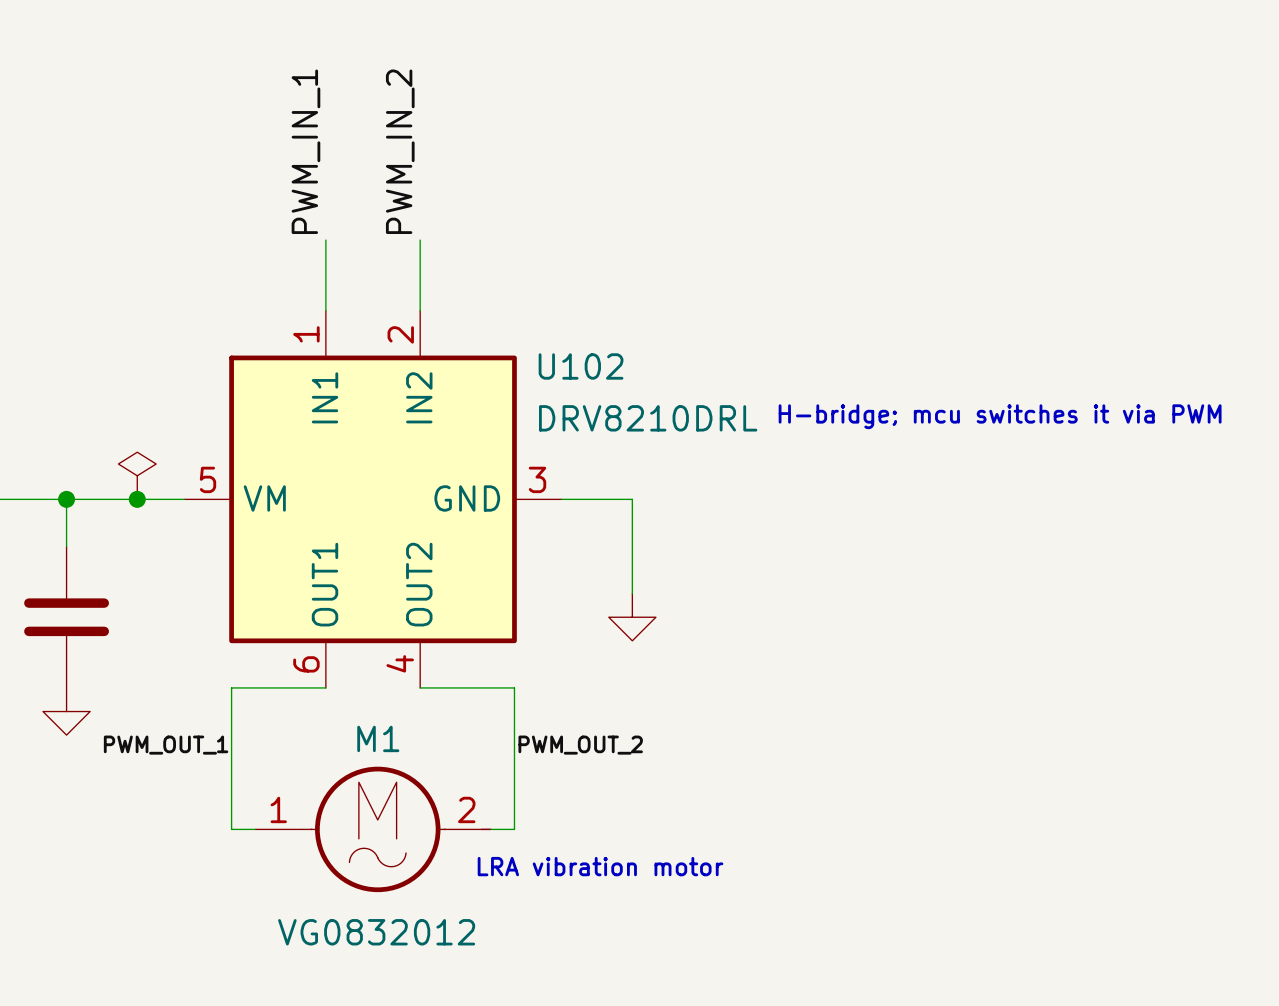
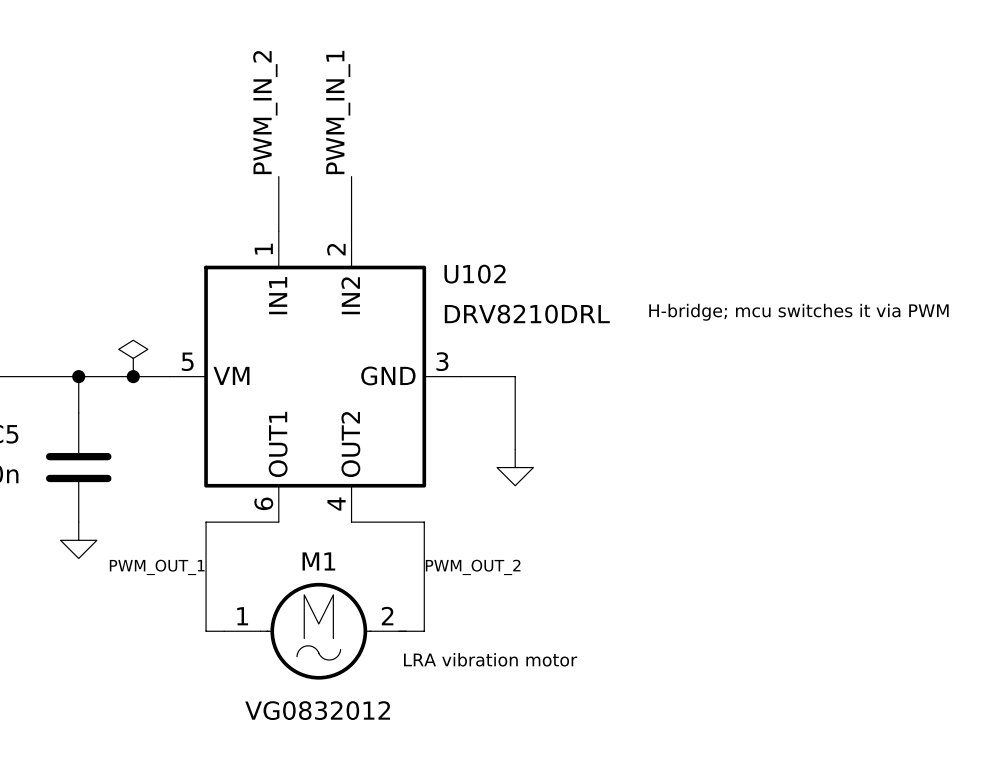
label: PWM_IN_1 (305, 151) -> PWM_IN_2 (265, 112)
label: PWM_IN_2 (400, 151) -> PWM_IN_1 (338, 112)

